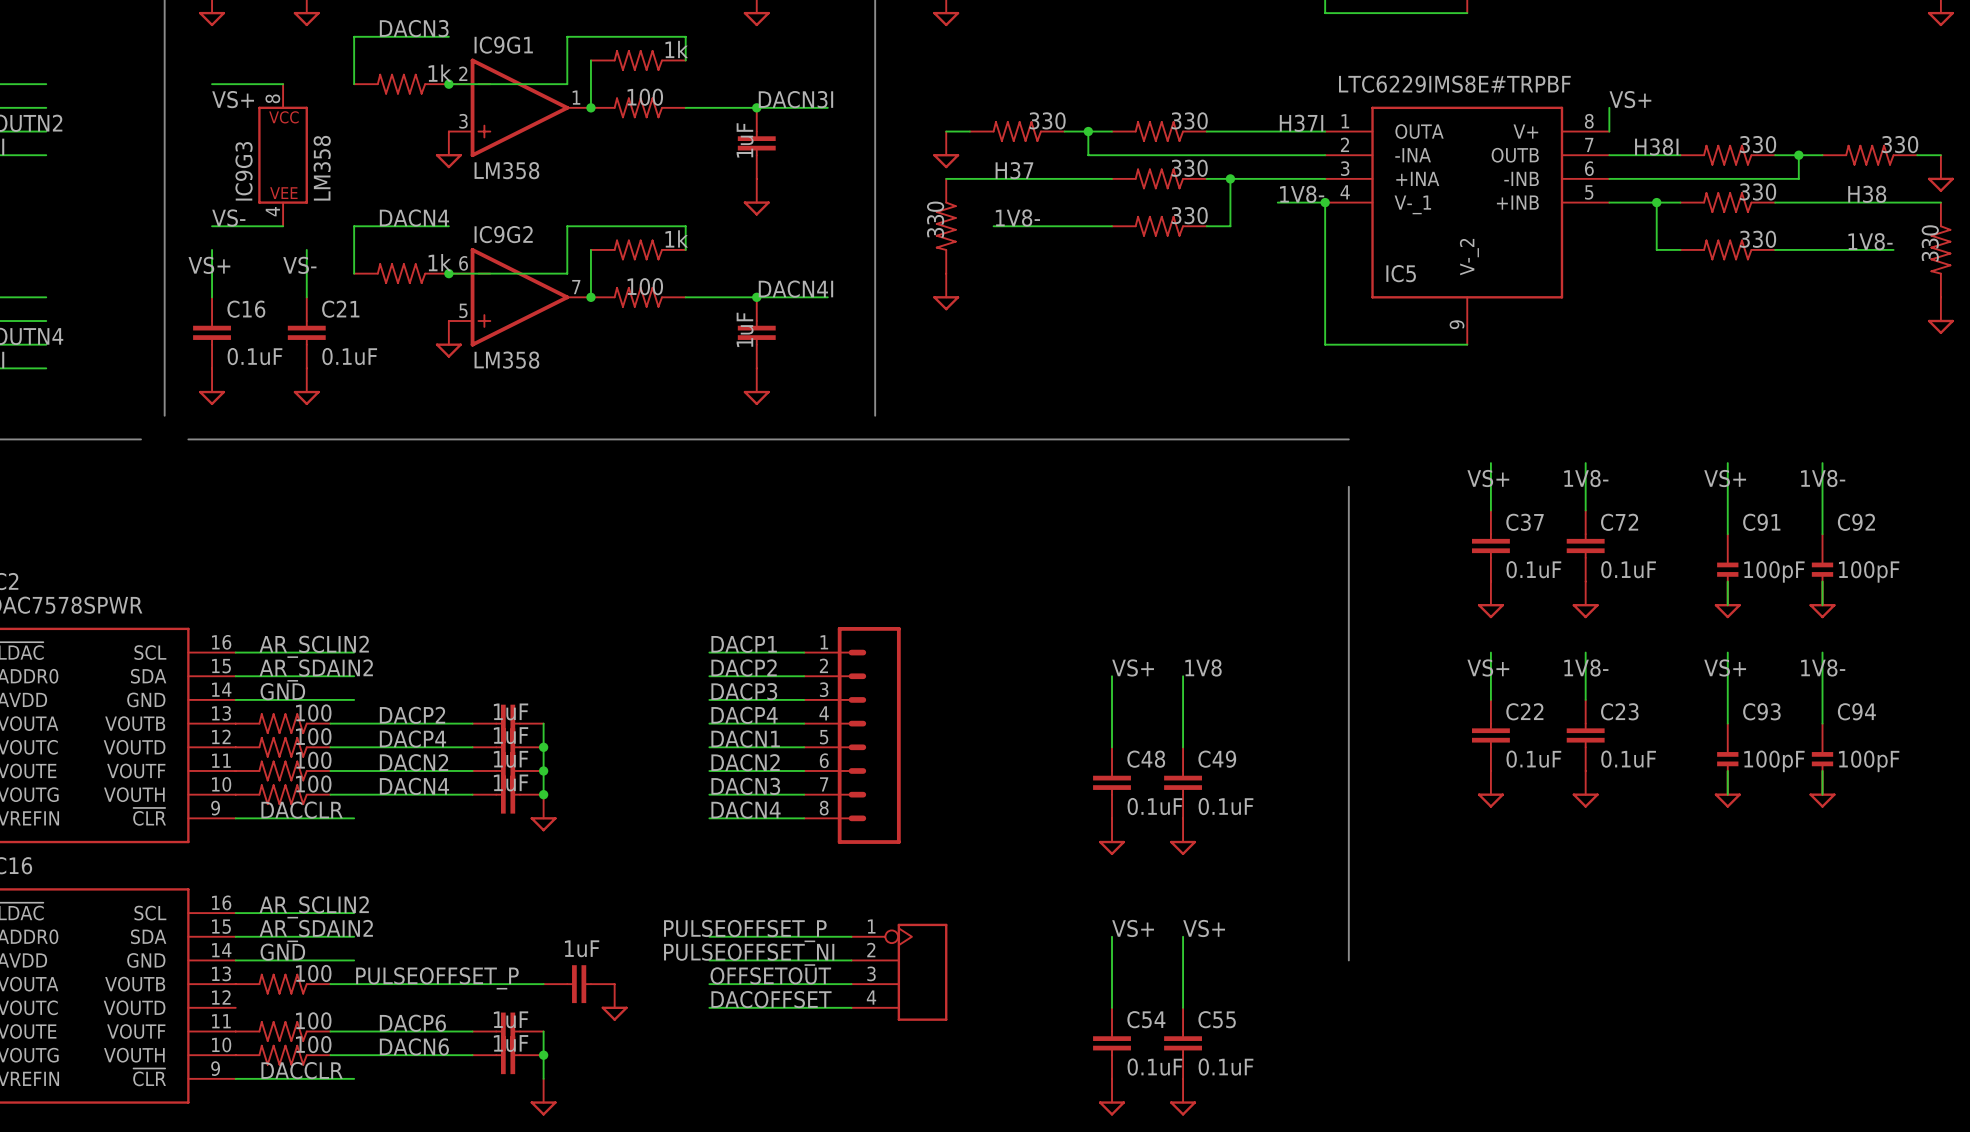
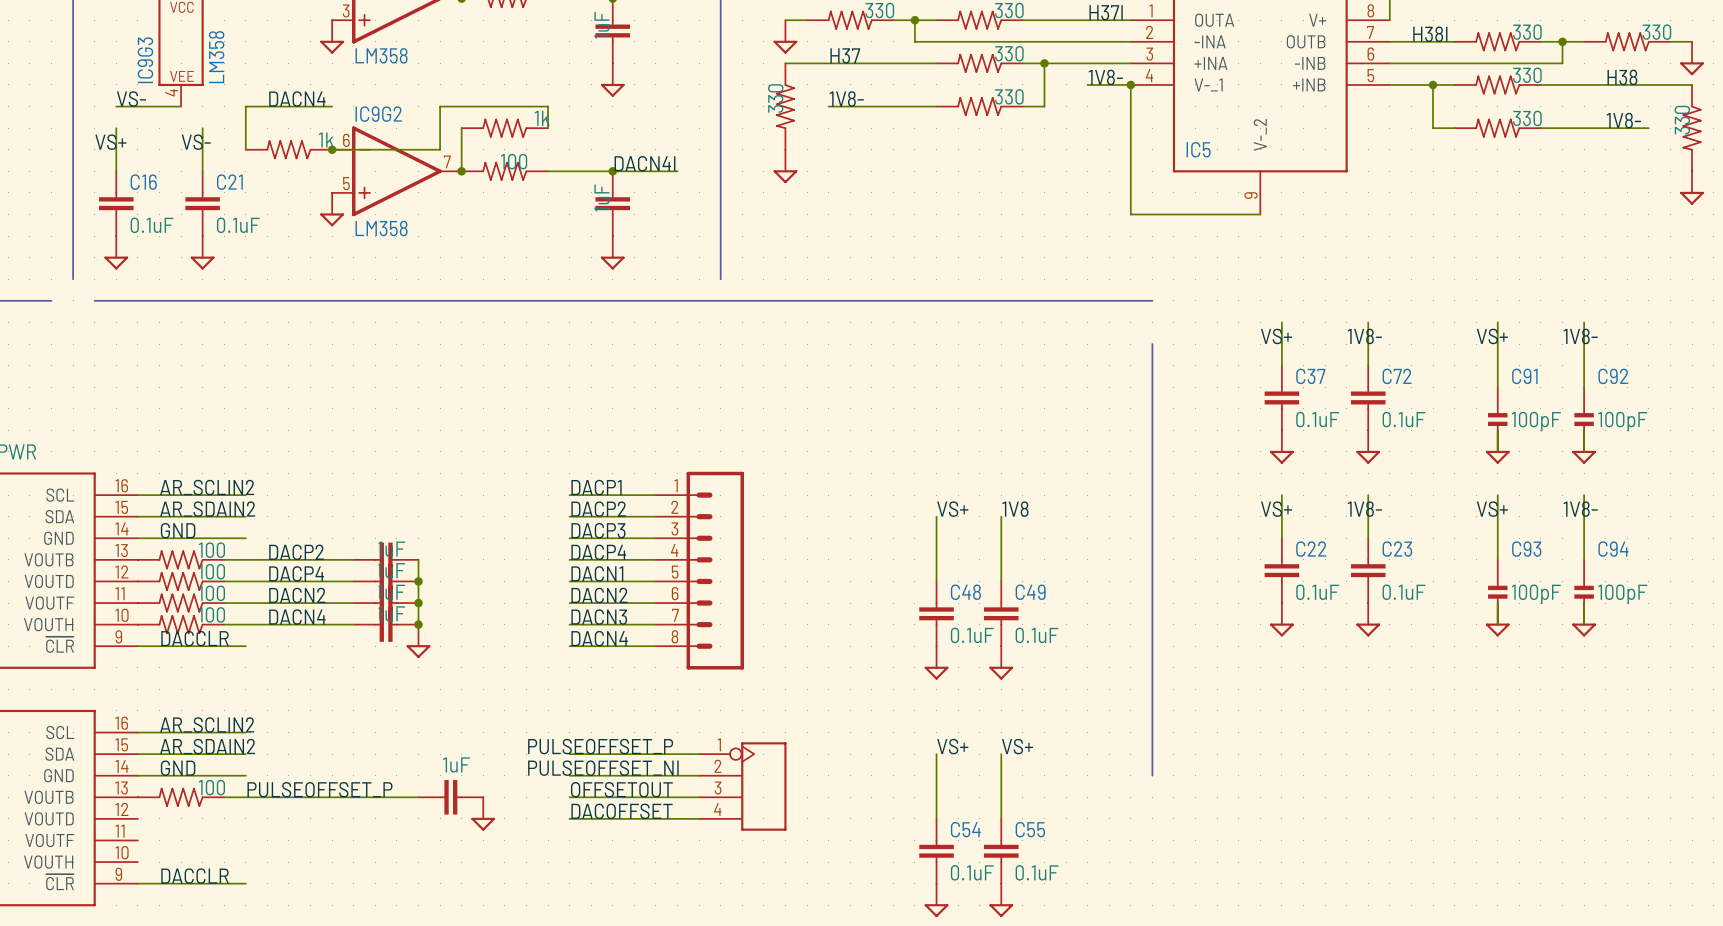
label: DACP6 (412, 1023) -> none
part: 100 (283, 1031) -> none
wire: (330, 1031) (472, 1031) -> none
part: 1uF (508, 1031) -> none
wire: (543, 1031) (543, 1078) -> none
label: DACN6 (414, 1046) -> none
part: 100 (283, 1055) -> none
wire: (330, 1055) (472, 1055) -> none
part: 1uF (508, 1055) -> none
junction: (543, 1055) -> none
power symbol: (543, 1097) -> none

